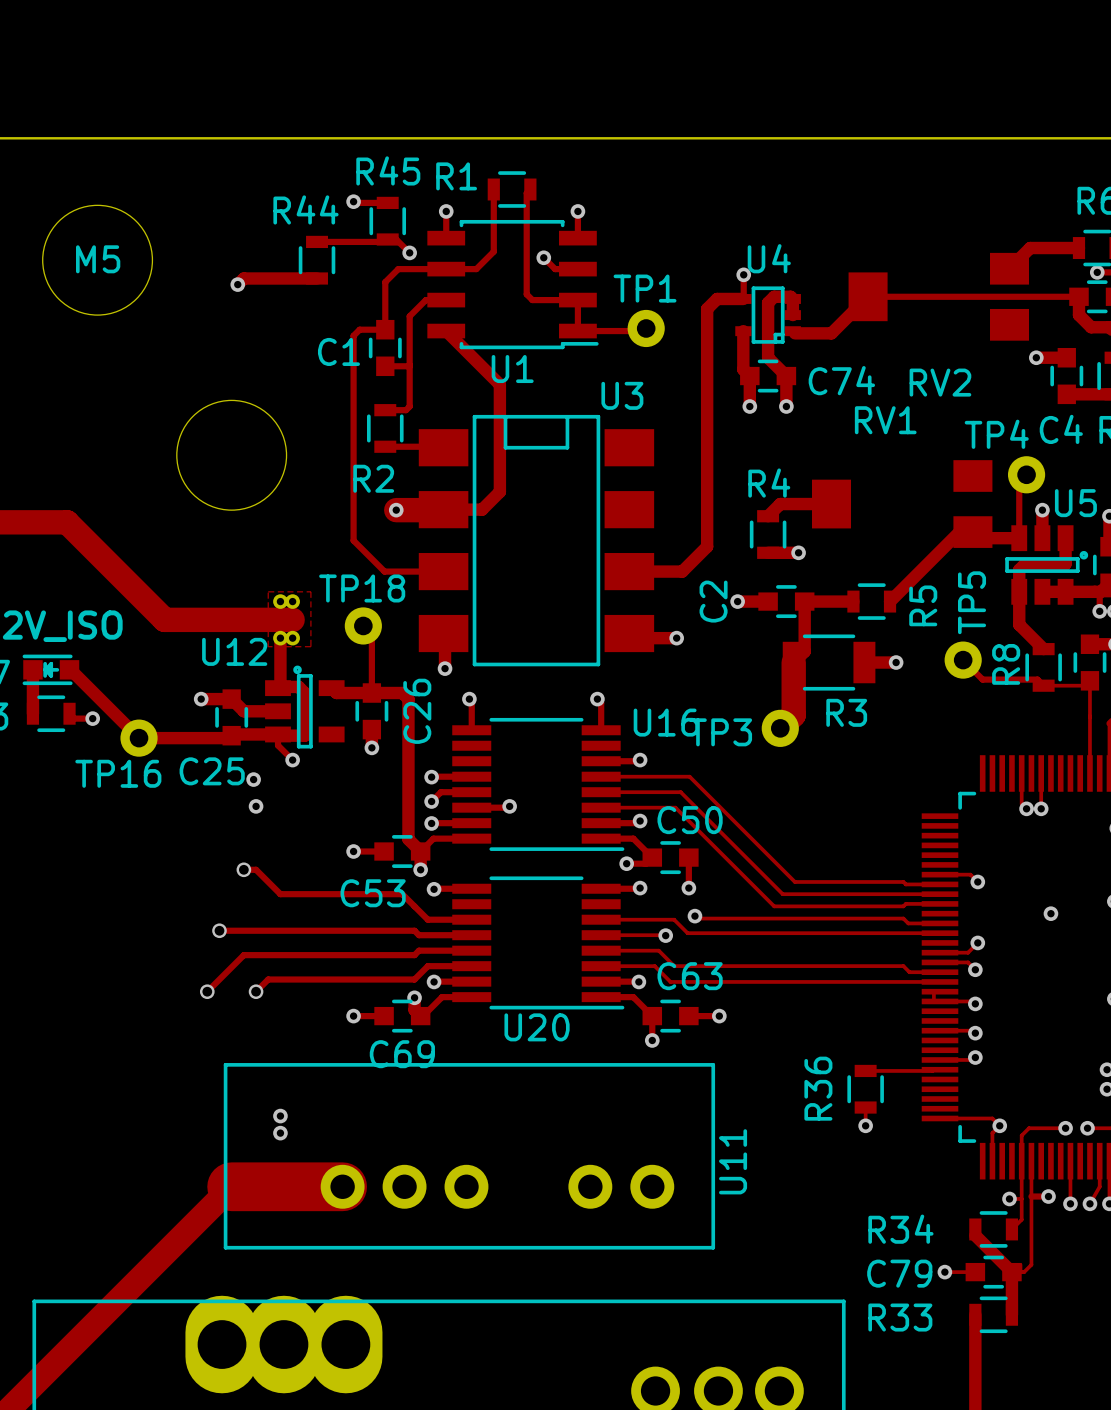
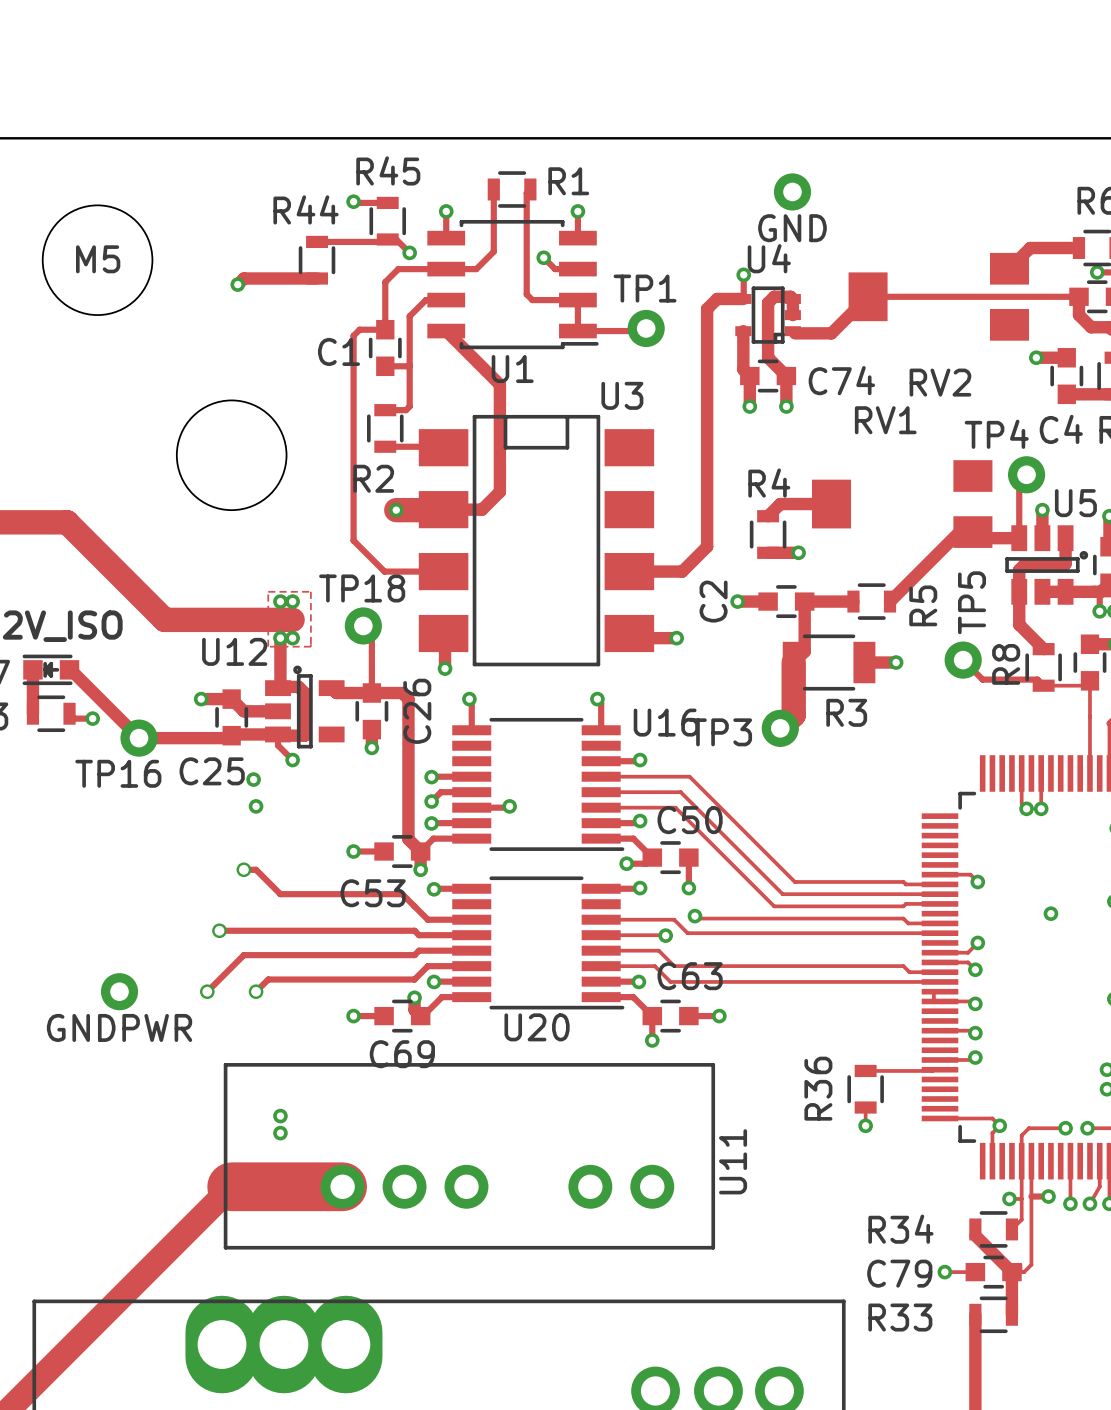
R1 name position: R1 (456, 176) -> R1 (568, 181)
GND: none -> (792, 191)
GNDPWR: none -> (119, 991)

